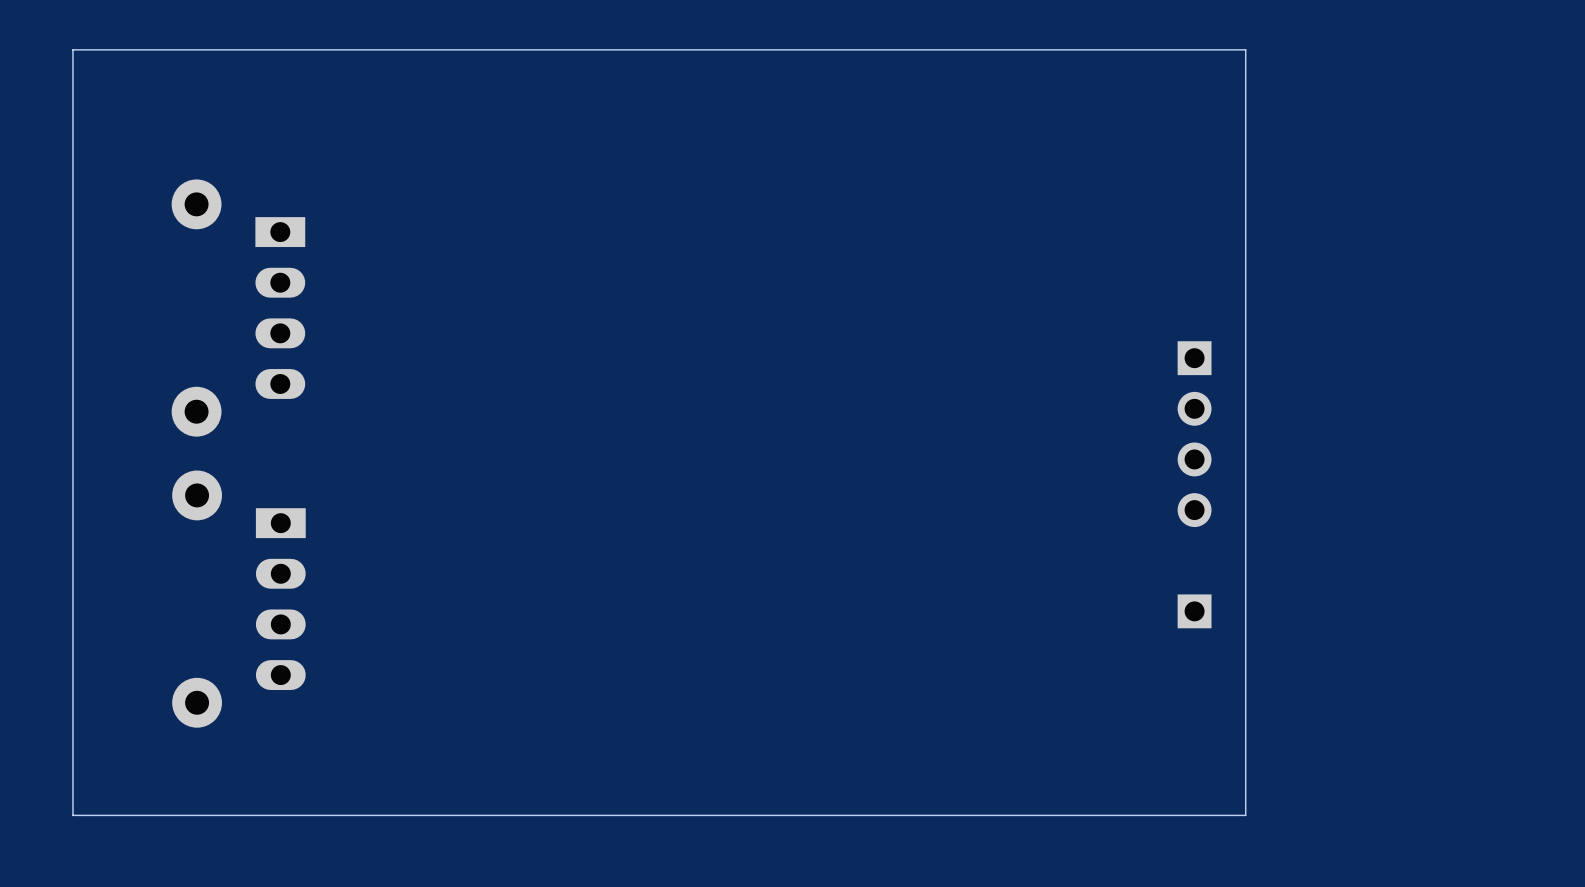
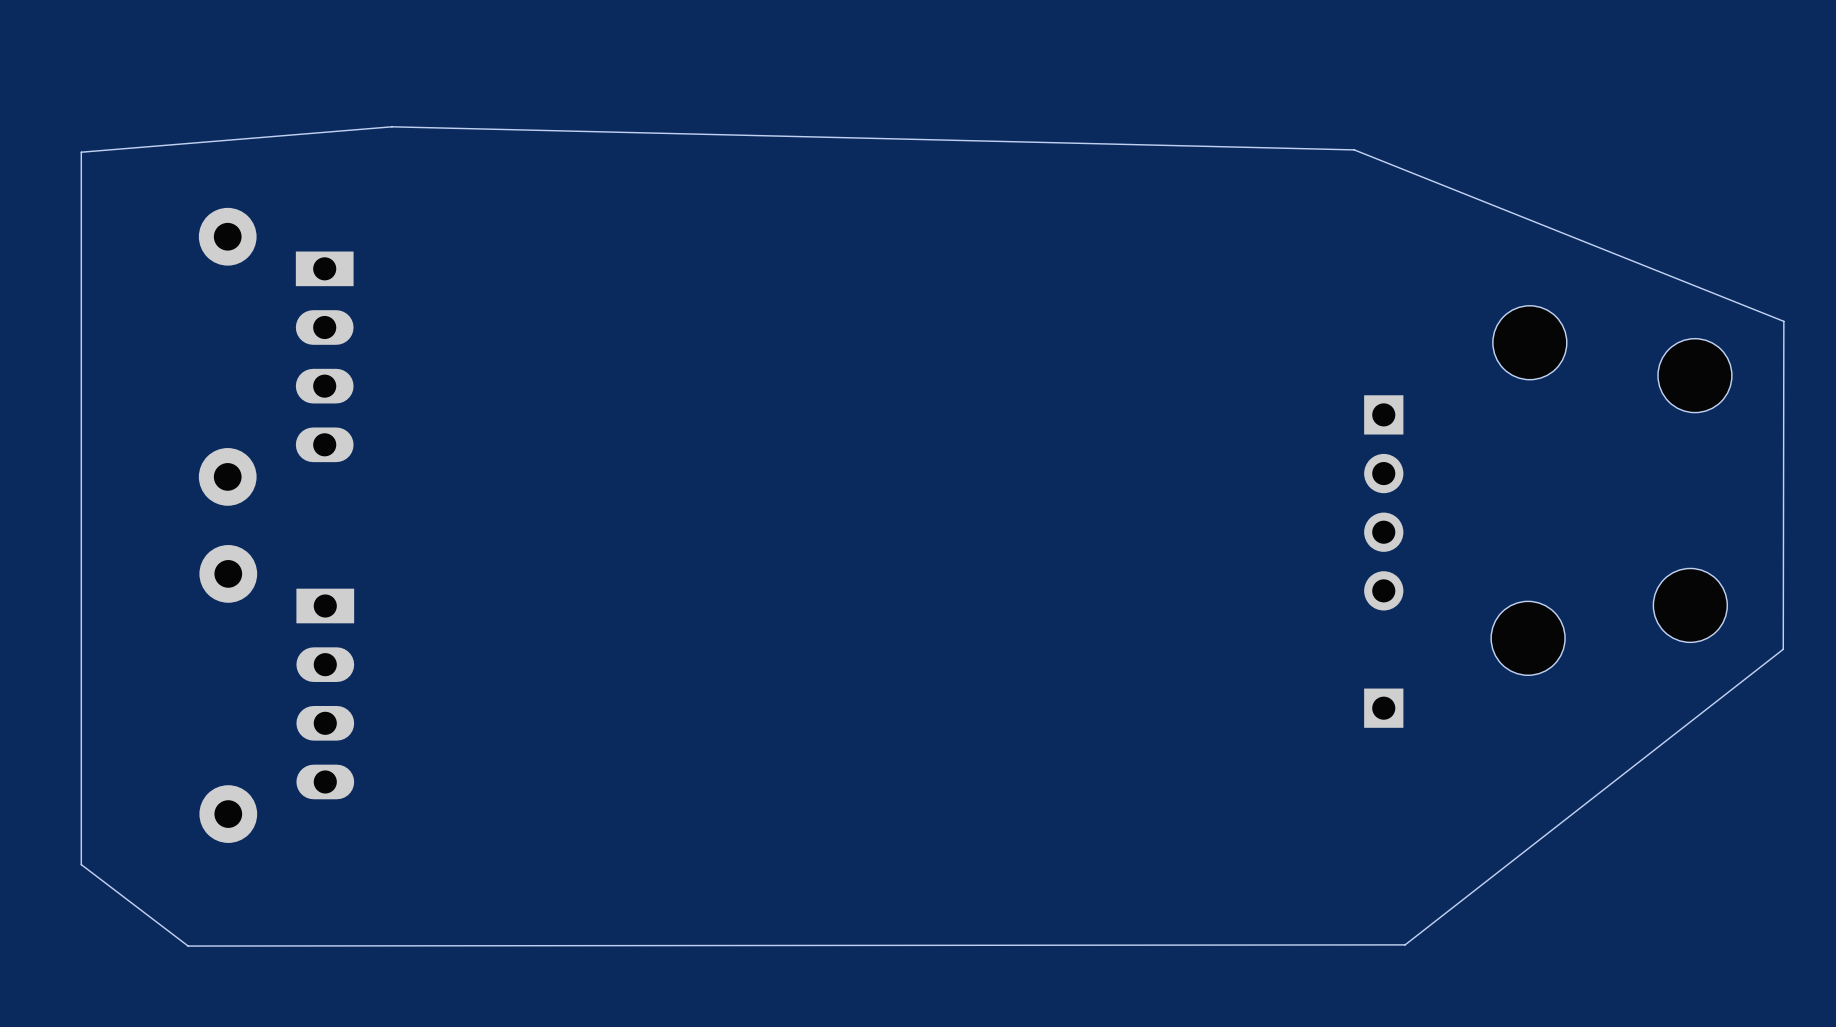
board edge: (1245, 49) (72, 49) (72, 815) (1245, 815) (1245, 49) -> (391, 126) (1354, 149) (1783, 321) (1783, 649) (1405, 944) (188, 946) (81, 864) (81, 152) (391, 126)
part: none -> (1529, 342)
part: none -> (1694, 375)
part: none -> (1690, 605)
part: none -> (1528, 638)

